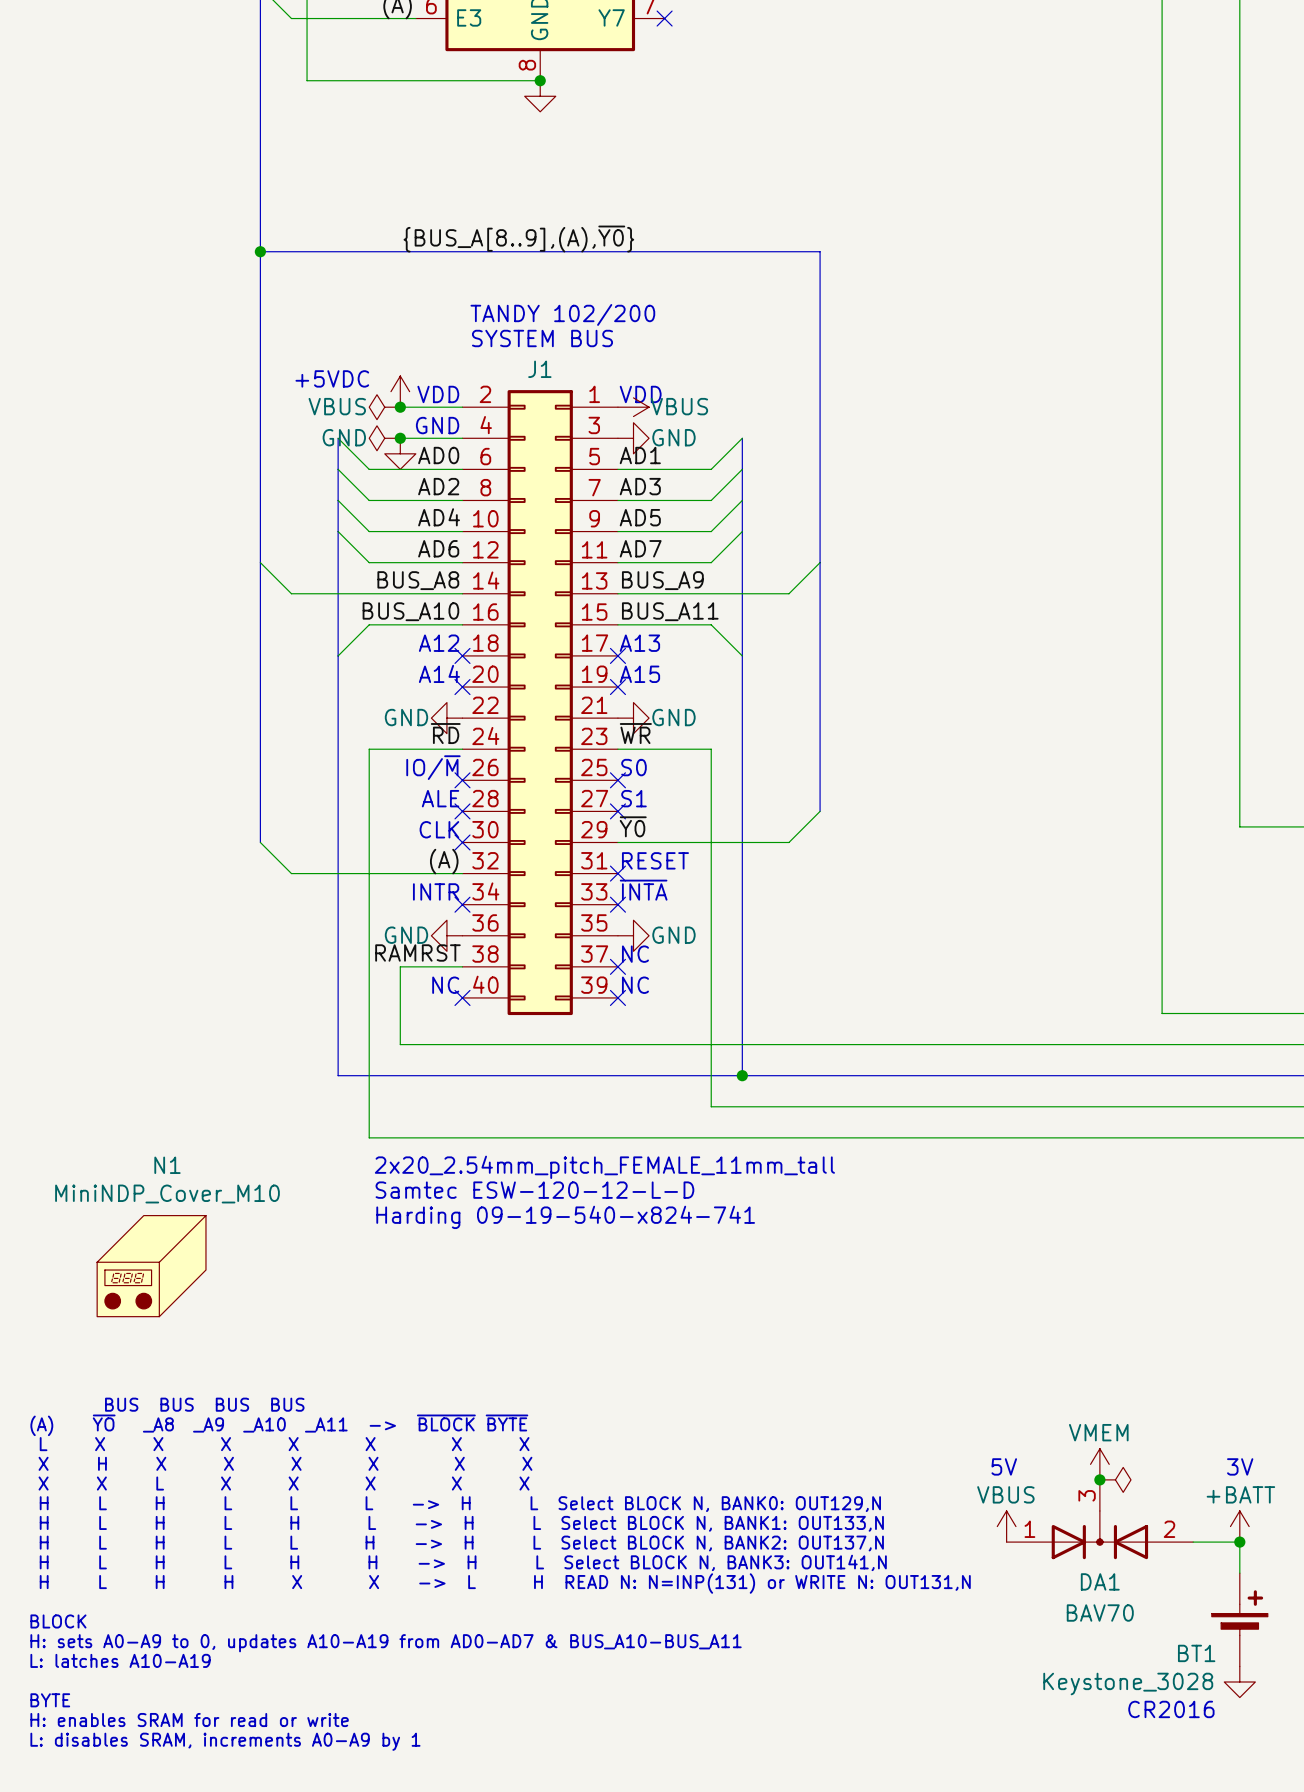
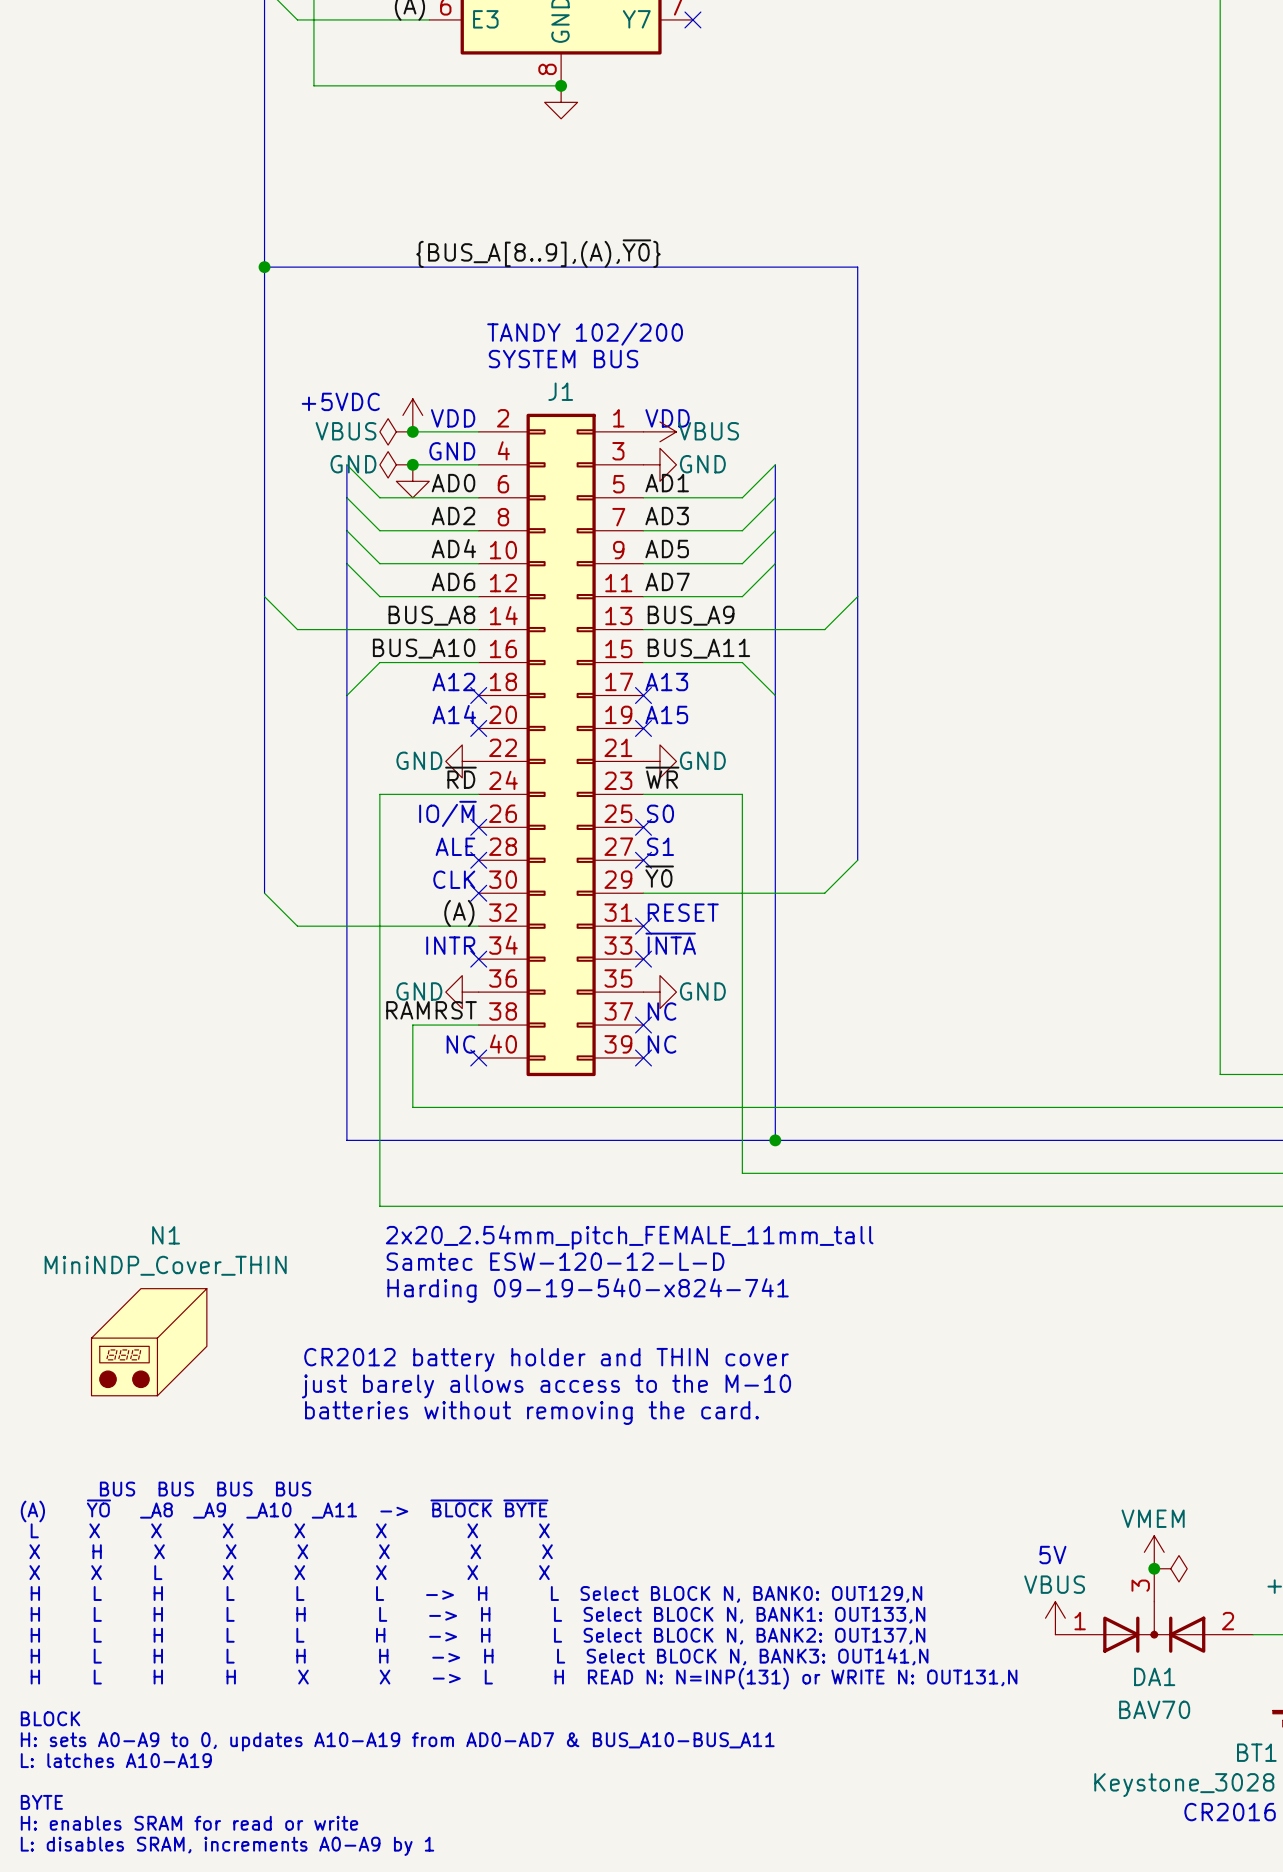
N1 value: MiniNDP_Cover_M10 (167, 1194) -> MiniNDP_Cover_THIN (165, 1265)
text: none -> CR2012 battery holder and THIN cover (546, 1359)
text: none -> just barely allows access to the M-10 (546, 1386)
text: none -> batteries without removing the card. (531, 1412)

